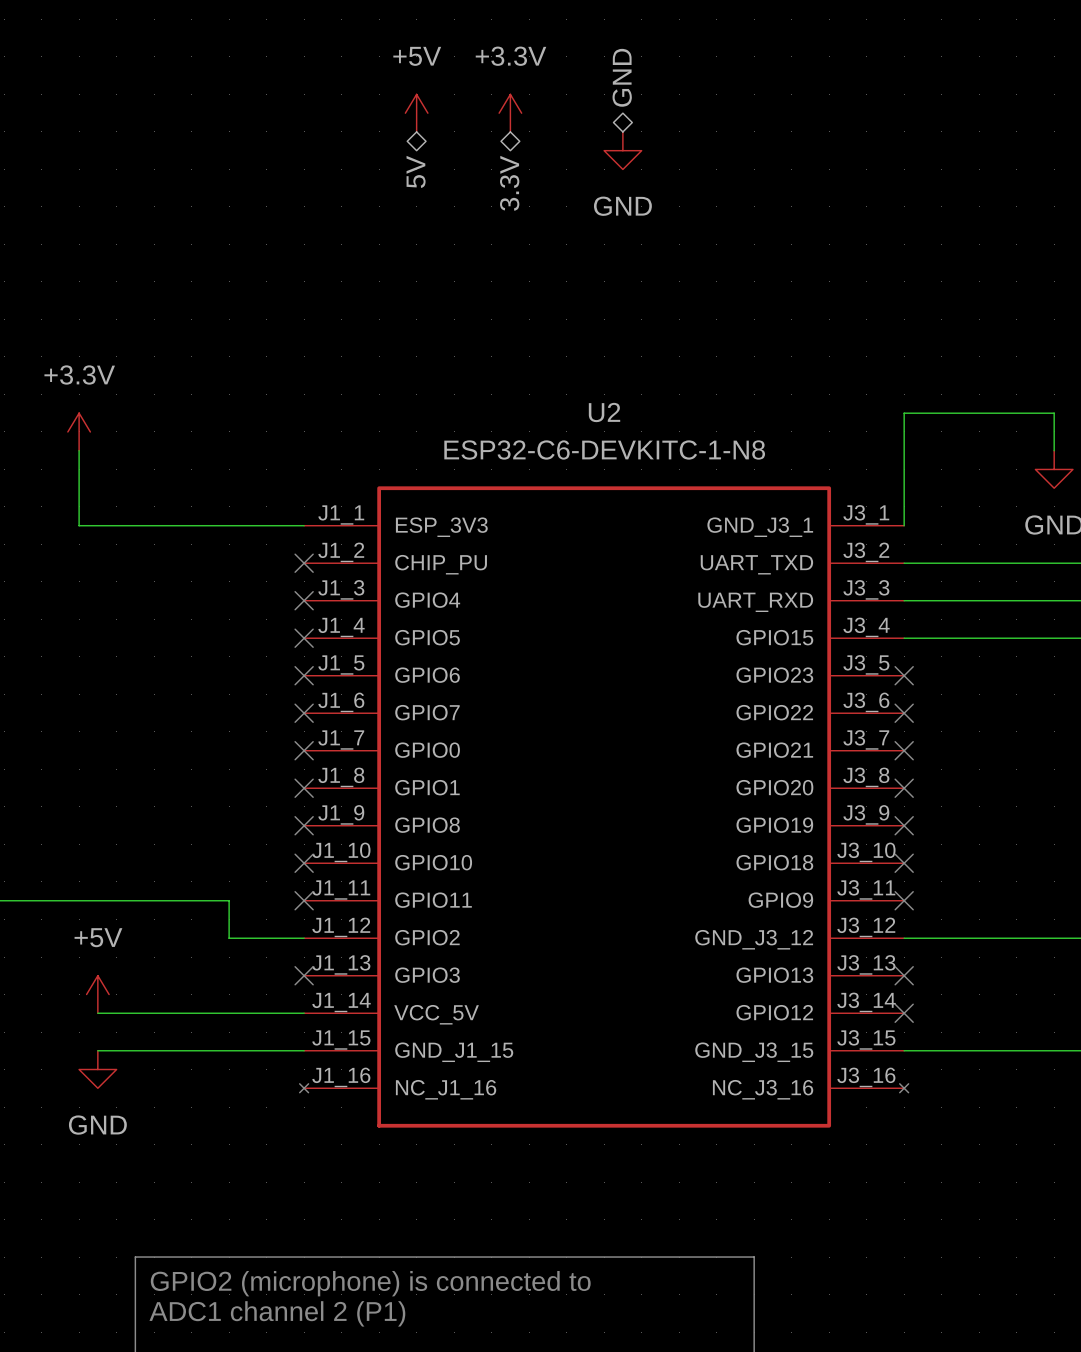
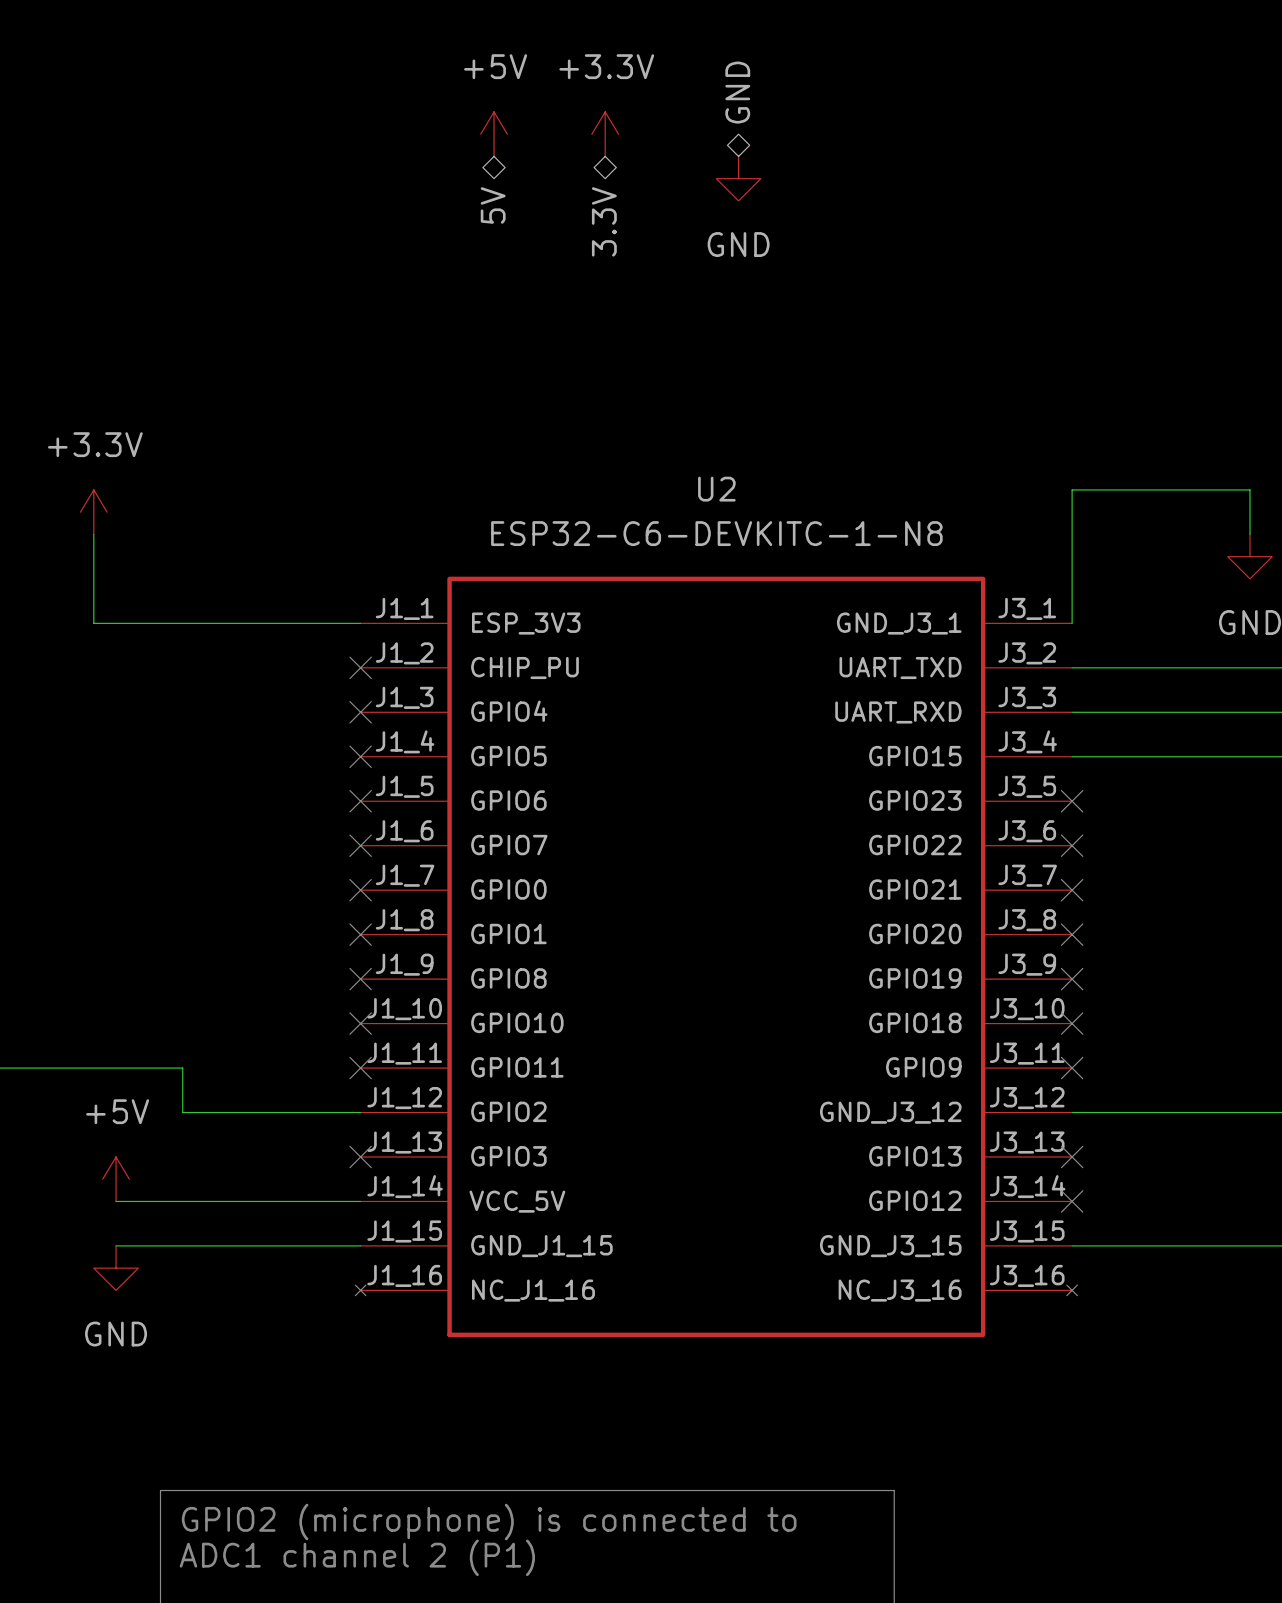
wire: (154, 900) (229, 900) (229, 938) -> (182, 1068) (182, 1112) (271, 1112)

